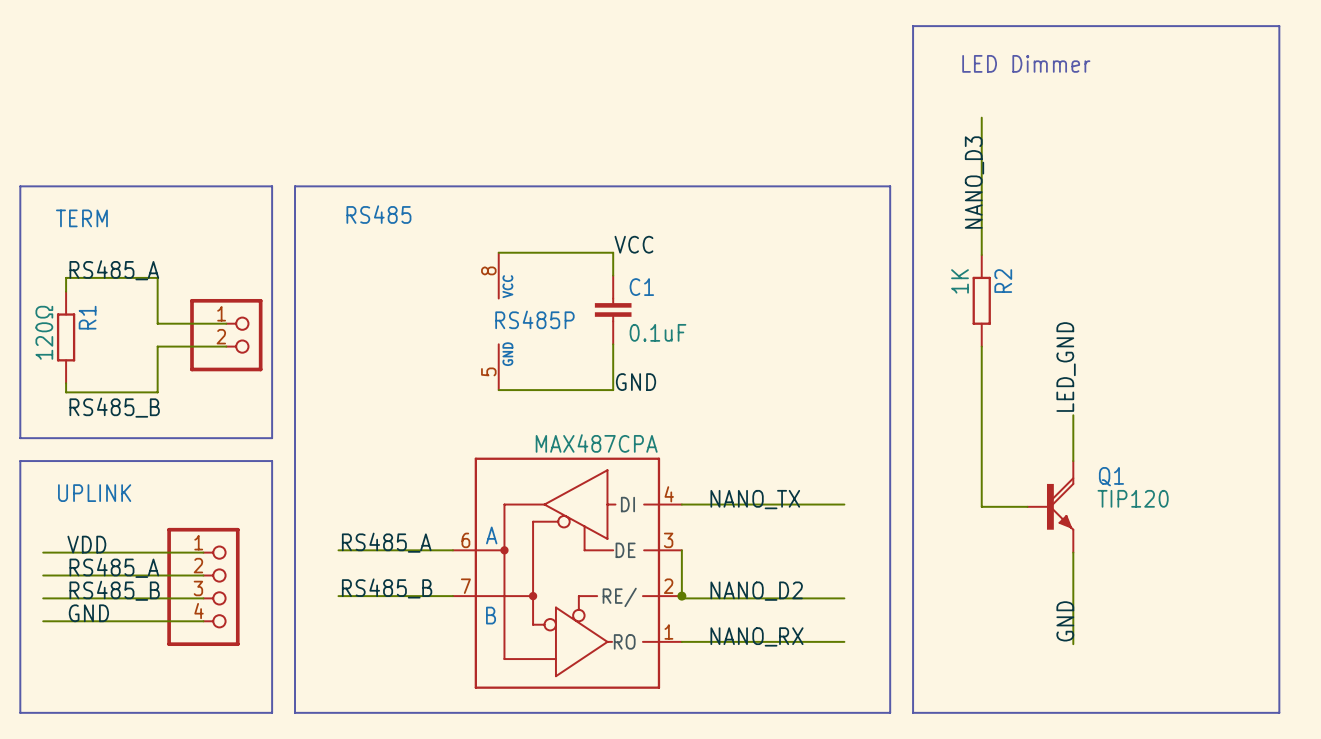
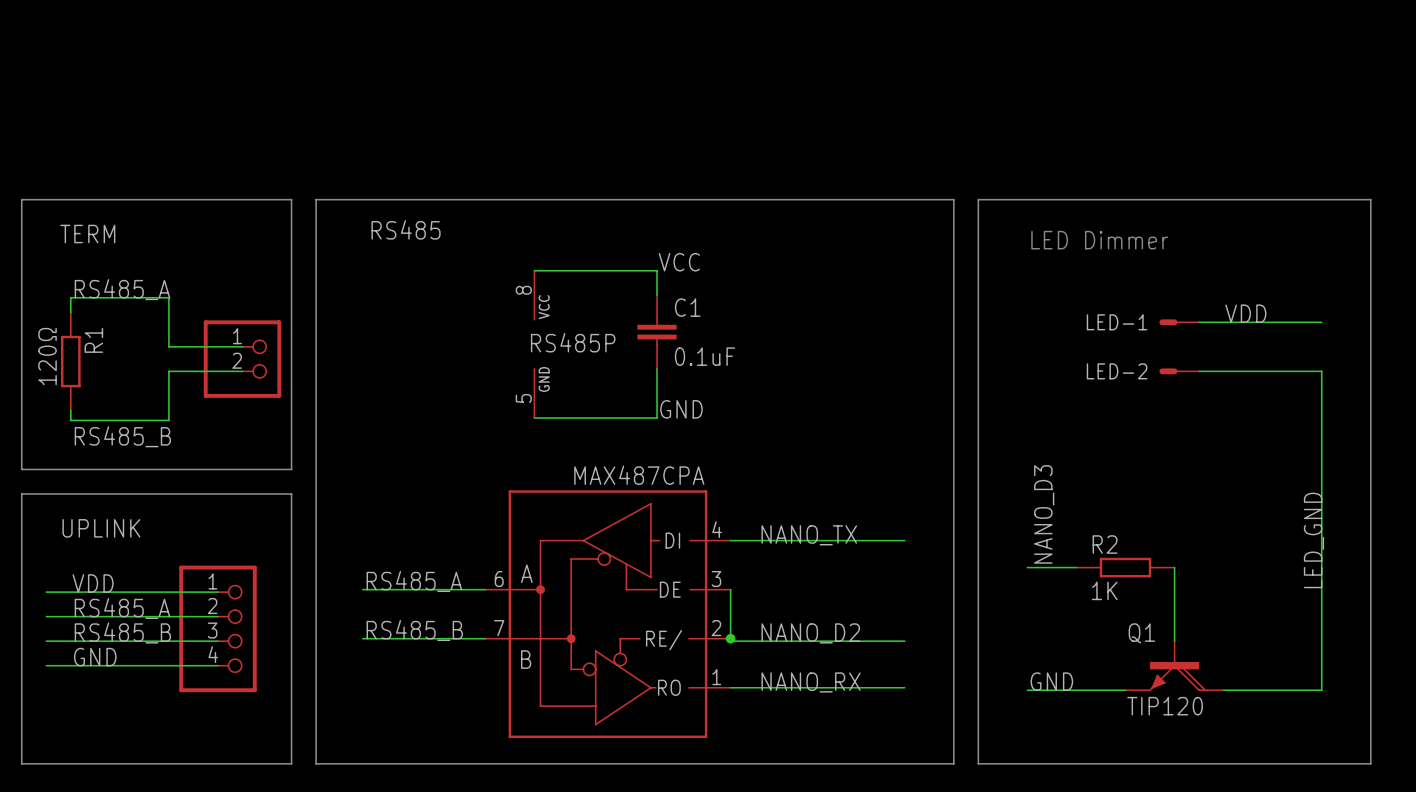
text position: LED Dimmer (1026, 63) -> LED Dimmer (1099, 240)
wire: (981, 117) (981, 255) -> none
label: NANO_D3 (974, 182) -> none
line: (913, 186) (913, 26) (1279, 26) (1279, 186) -> (978, 199) (1370, 199)
R2 value position: 1K (960, 281) -> 1K (1104, 590)
R2 name position: R2 (1003, 281) -> R2 (1105, 544)
label: none -> VDD (1245, 313)
R2 rotation: 0° (981, 300) -> 90° clockwise (1125, 567)
R2 position: (981, 300) -> (1125, 567)
LED-1: none -> (1179, 322)
wire: none -> (1199, 322) (1321, 322)
wire: (981, 346) (981, 506) (1027, 506) -> none
LED-2: none -> (1179, 371)
wire: none -> (1199, 371) (1321, 371) (1321, 690) (1223, 690)
label position: LED_GND (1066, 367) -> LED_GND (1313, 540)
wire: (1073, 415) (1073, 461) -> none
Q1 name position: Q1 (1111, 476) -> Q1 (1141, 633)
label: none -> NANO_D3 (1044, 514)
Q1 value position: TIP120 (1133, 498) -> TIP120 (1165, 706)
Q1 rotation: 0° (1060, 503) -> 90° clockwise (1177, 676)
Q1 position: (1050, 506) -> (1174, 666)
wire: none -> (1027, 567) (1076, 567)
wire: none -> (1174, 567) (1174, 641)
wire: (1073, 552) (1073, 644) -> none
label rotation: 0° (1065, 621) -> 90° clockwise (1051, 681)
label position: GND (1065, 621) -> GND (1051, 681)
wire: none -> (1027, 690) (1125, 690)

